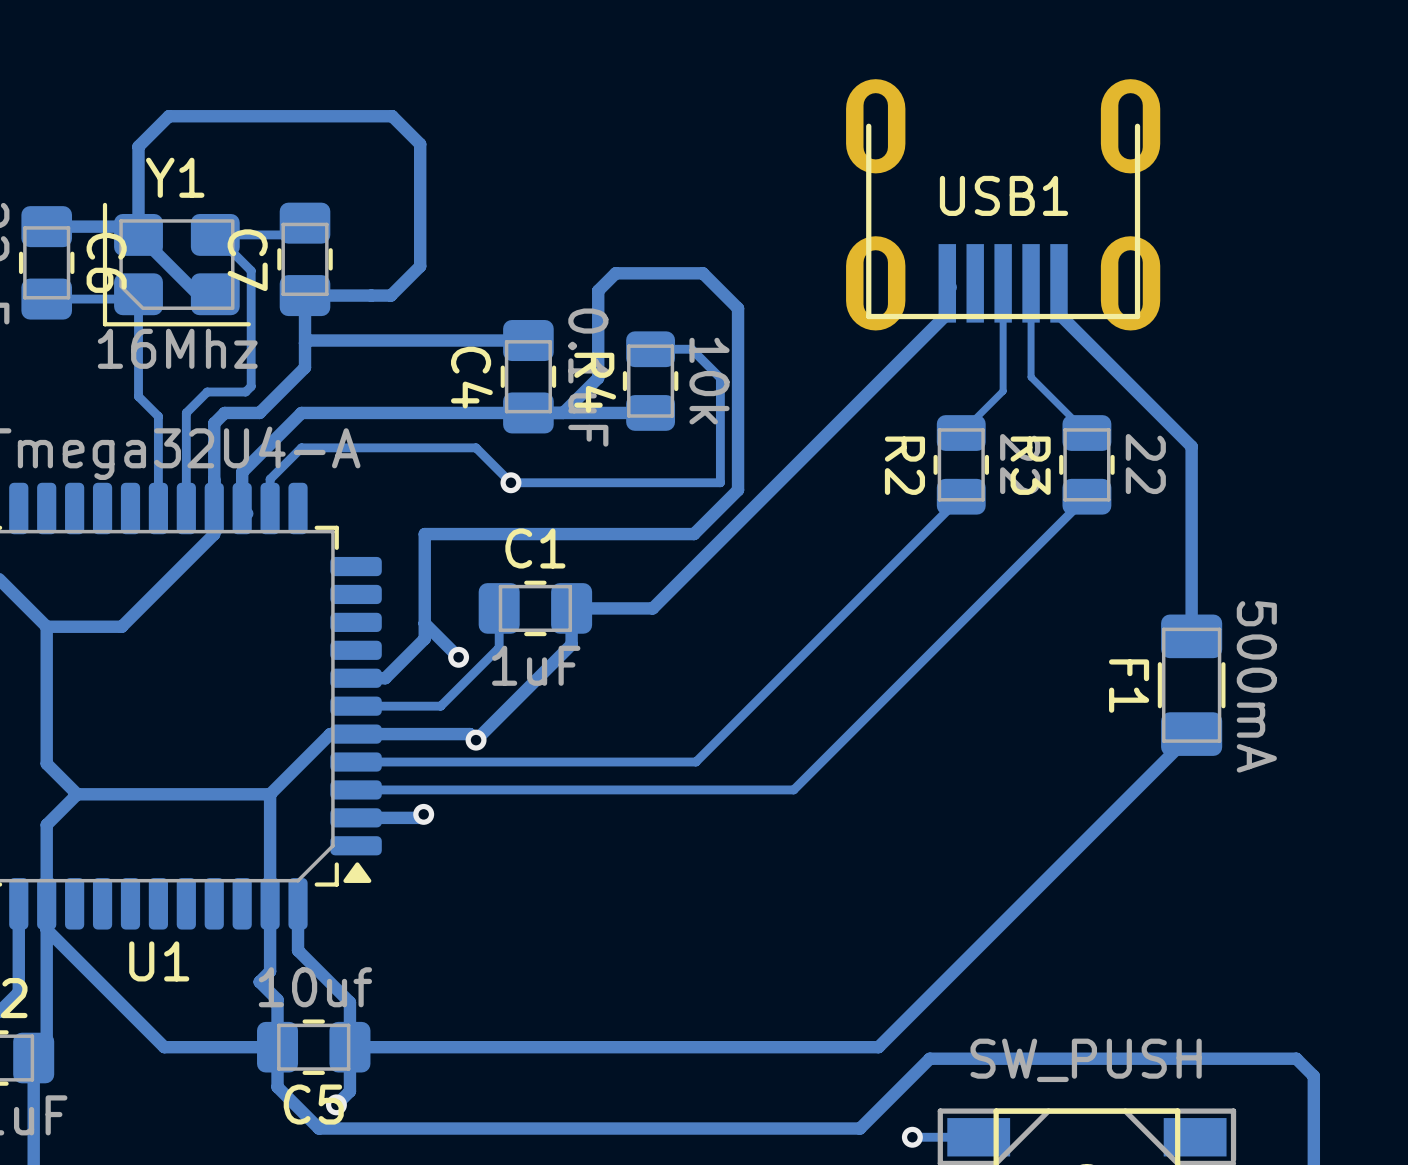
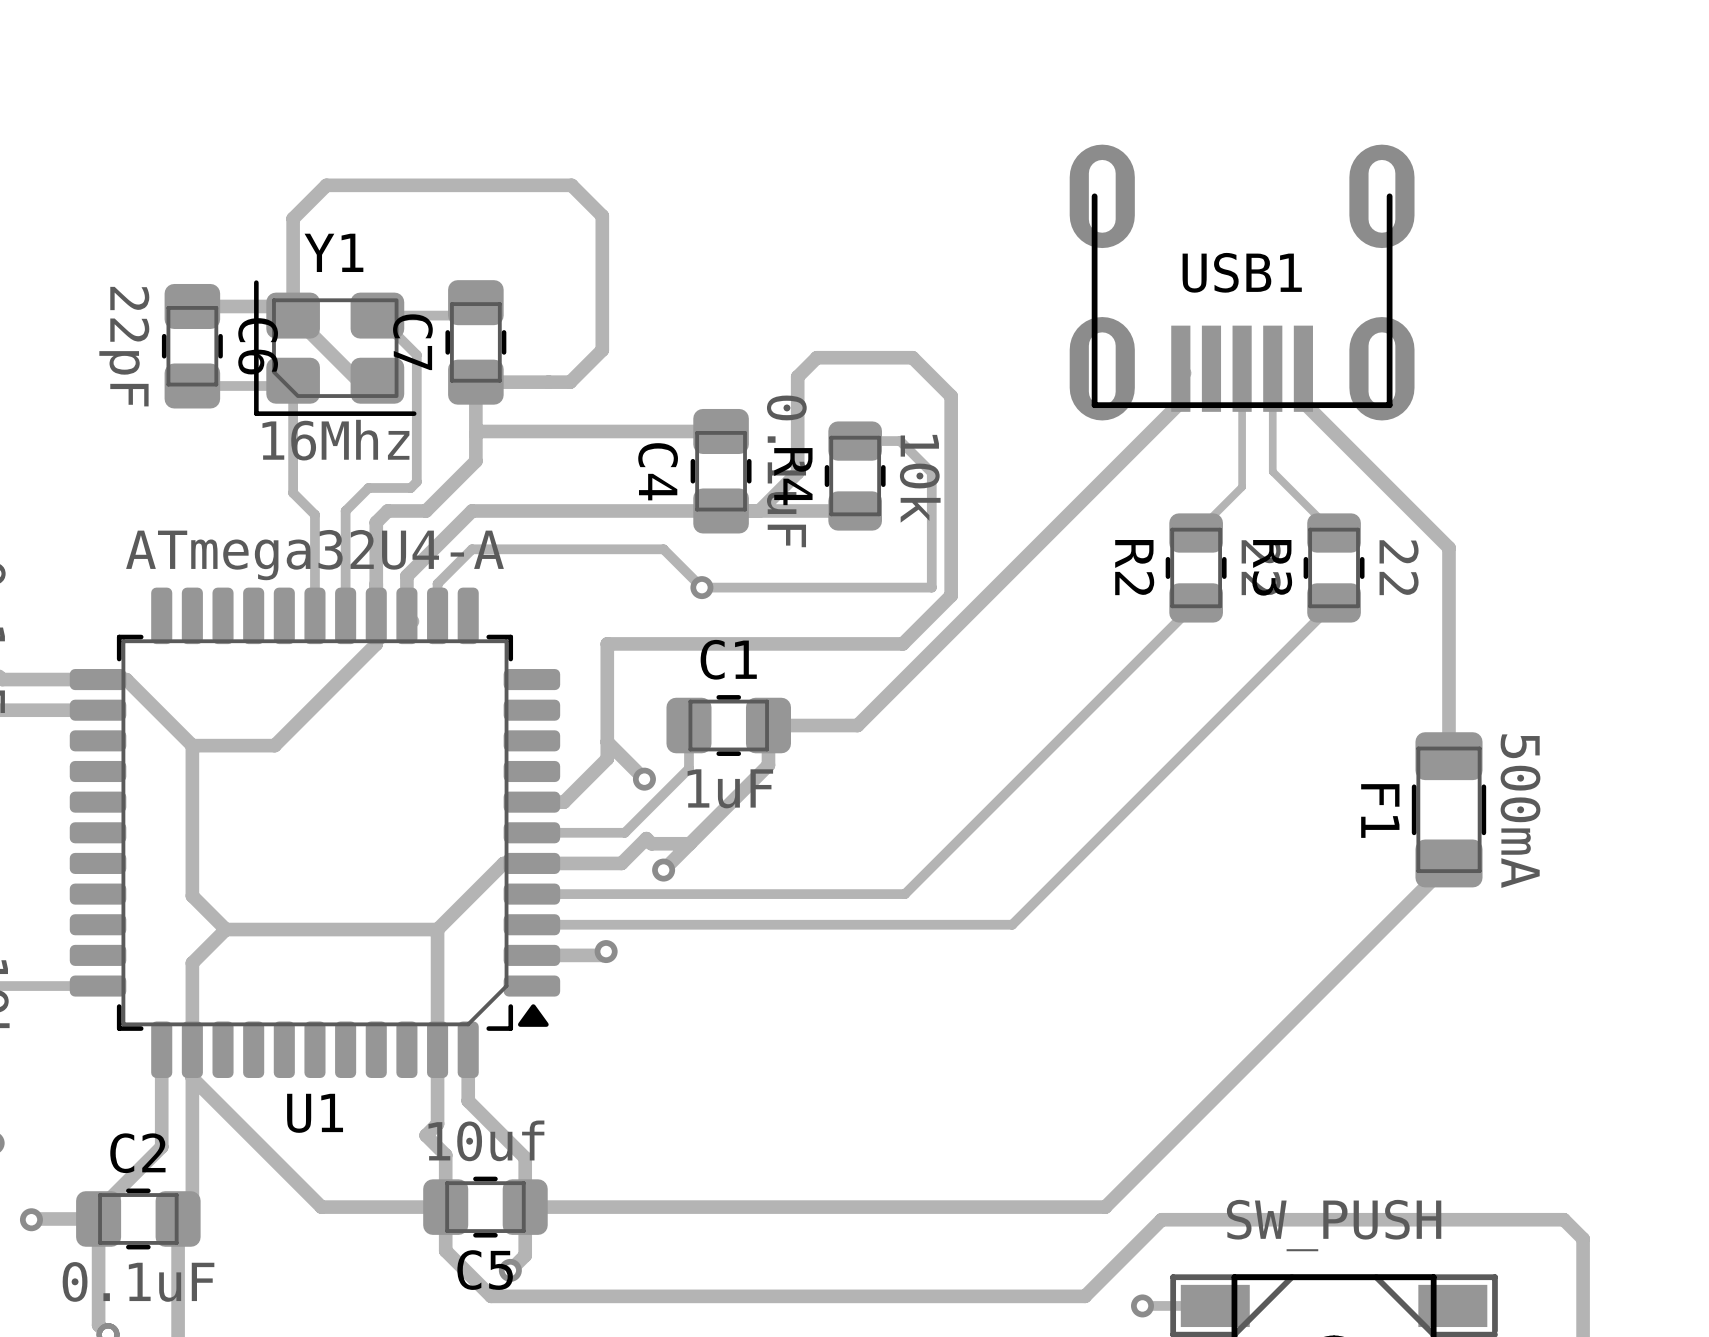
track: (437, 734) (470, 734) (476, 740) -> (621, 863) (646, 838) (651, 843) (689, 843)

